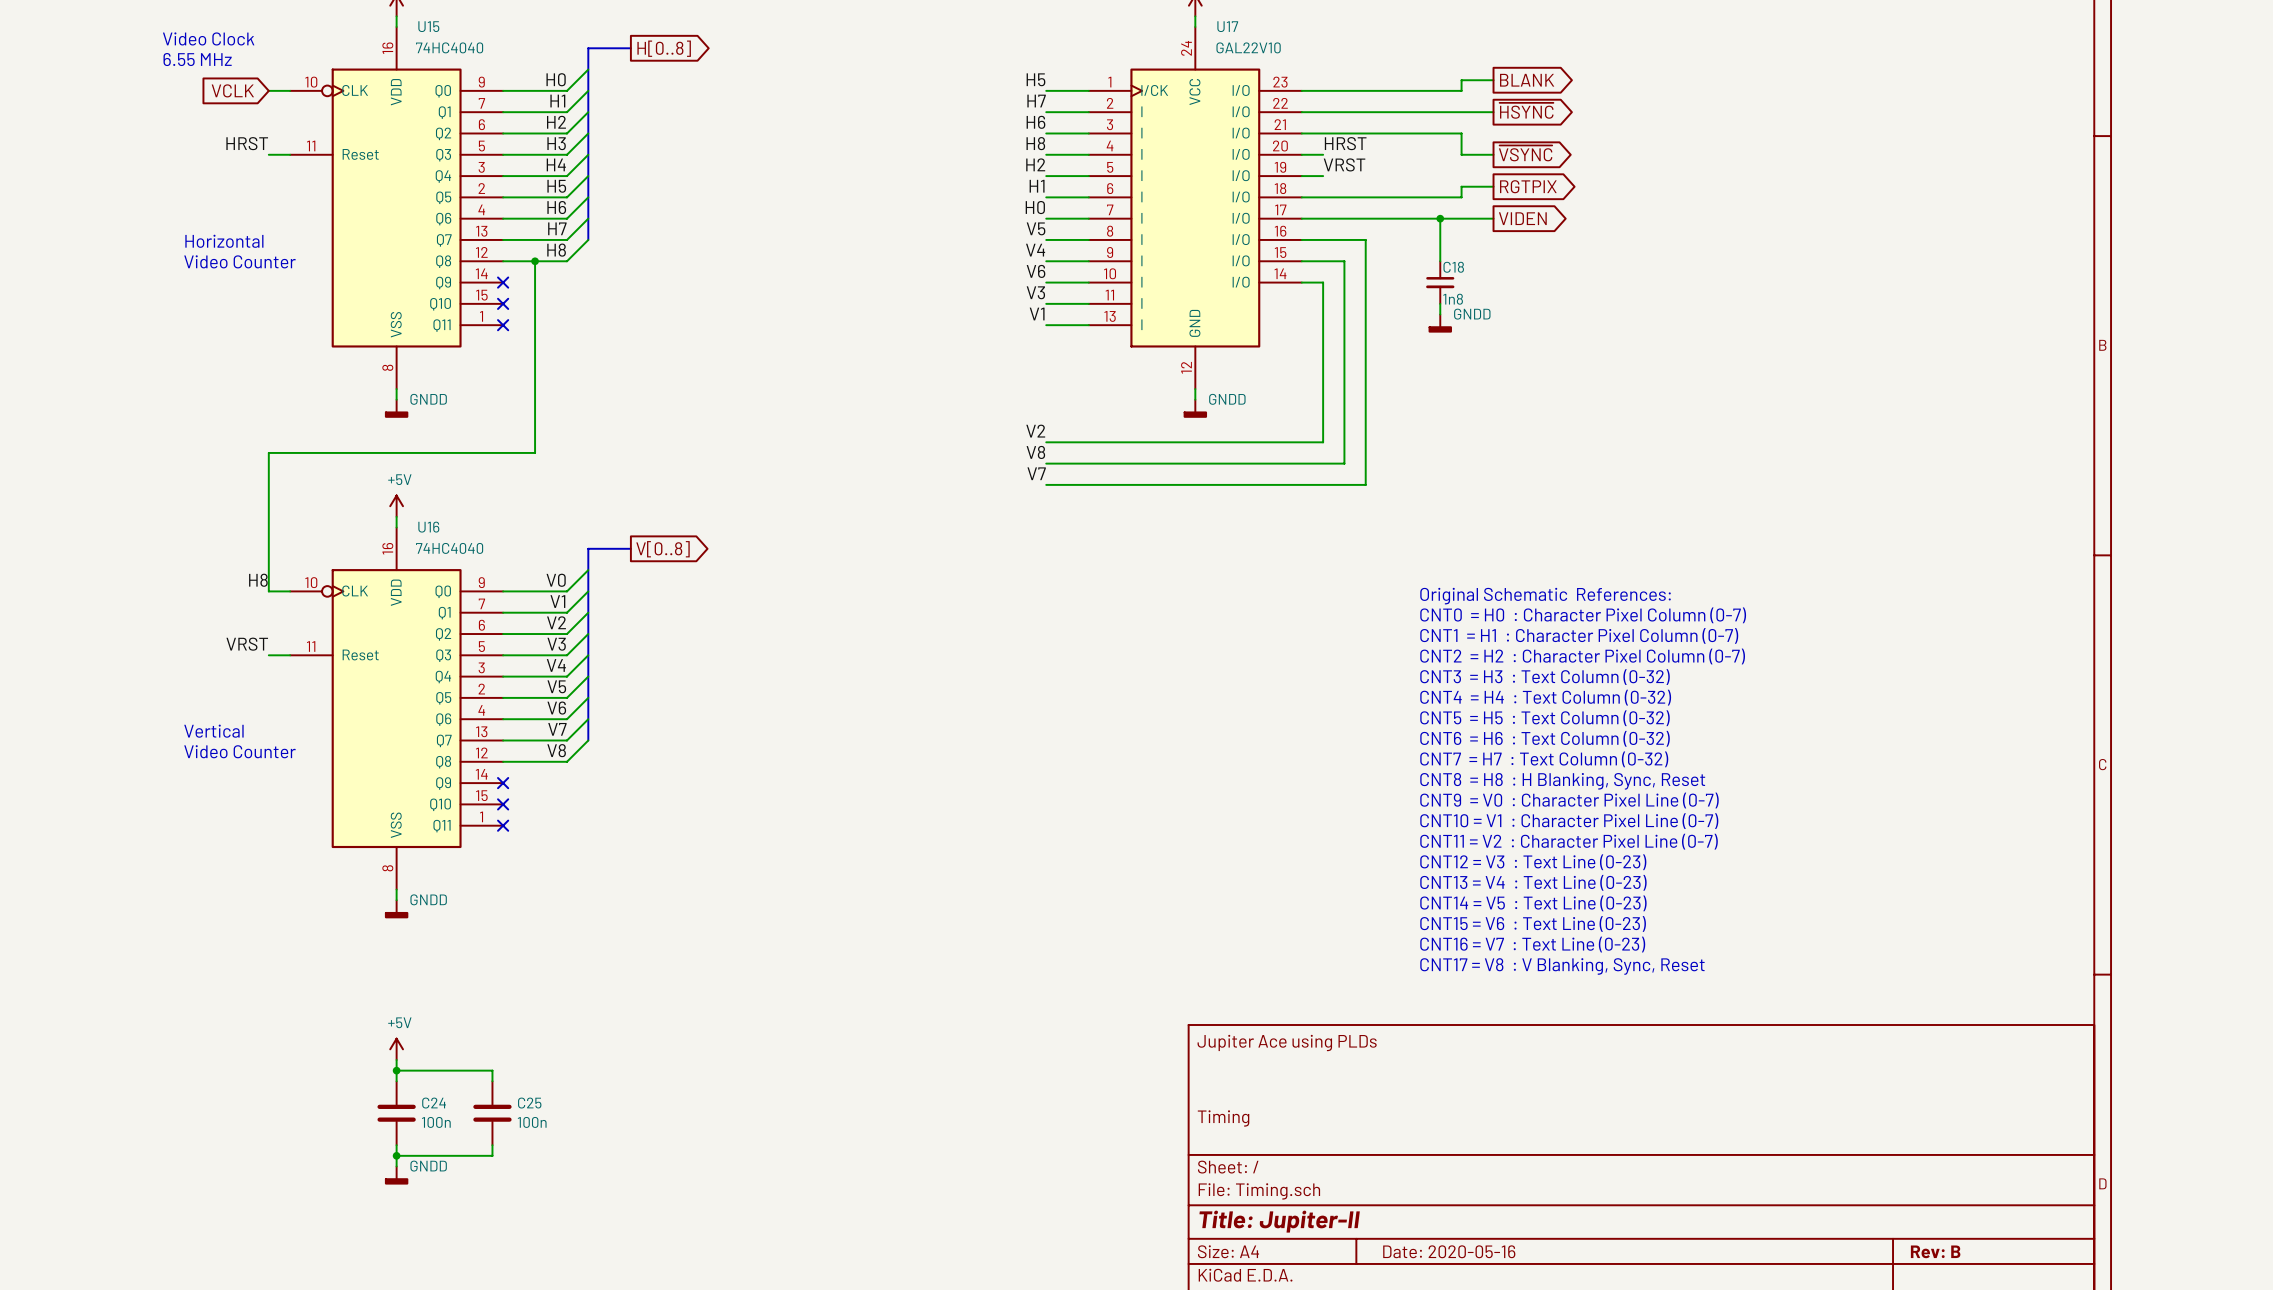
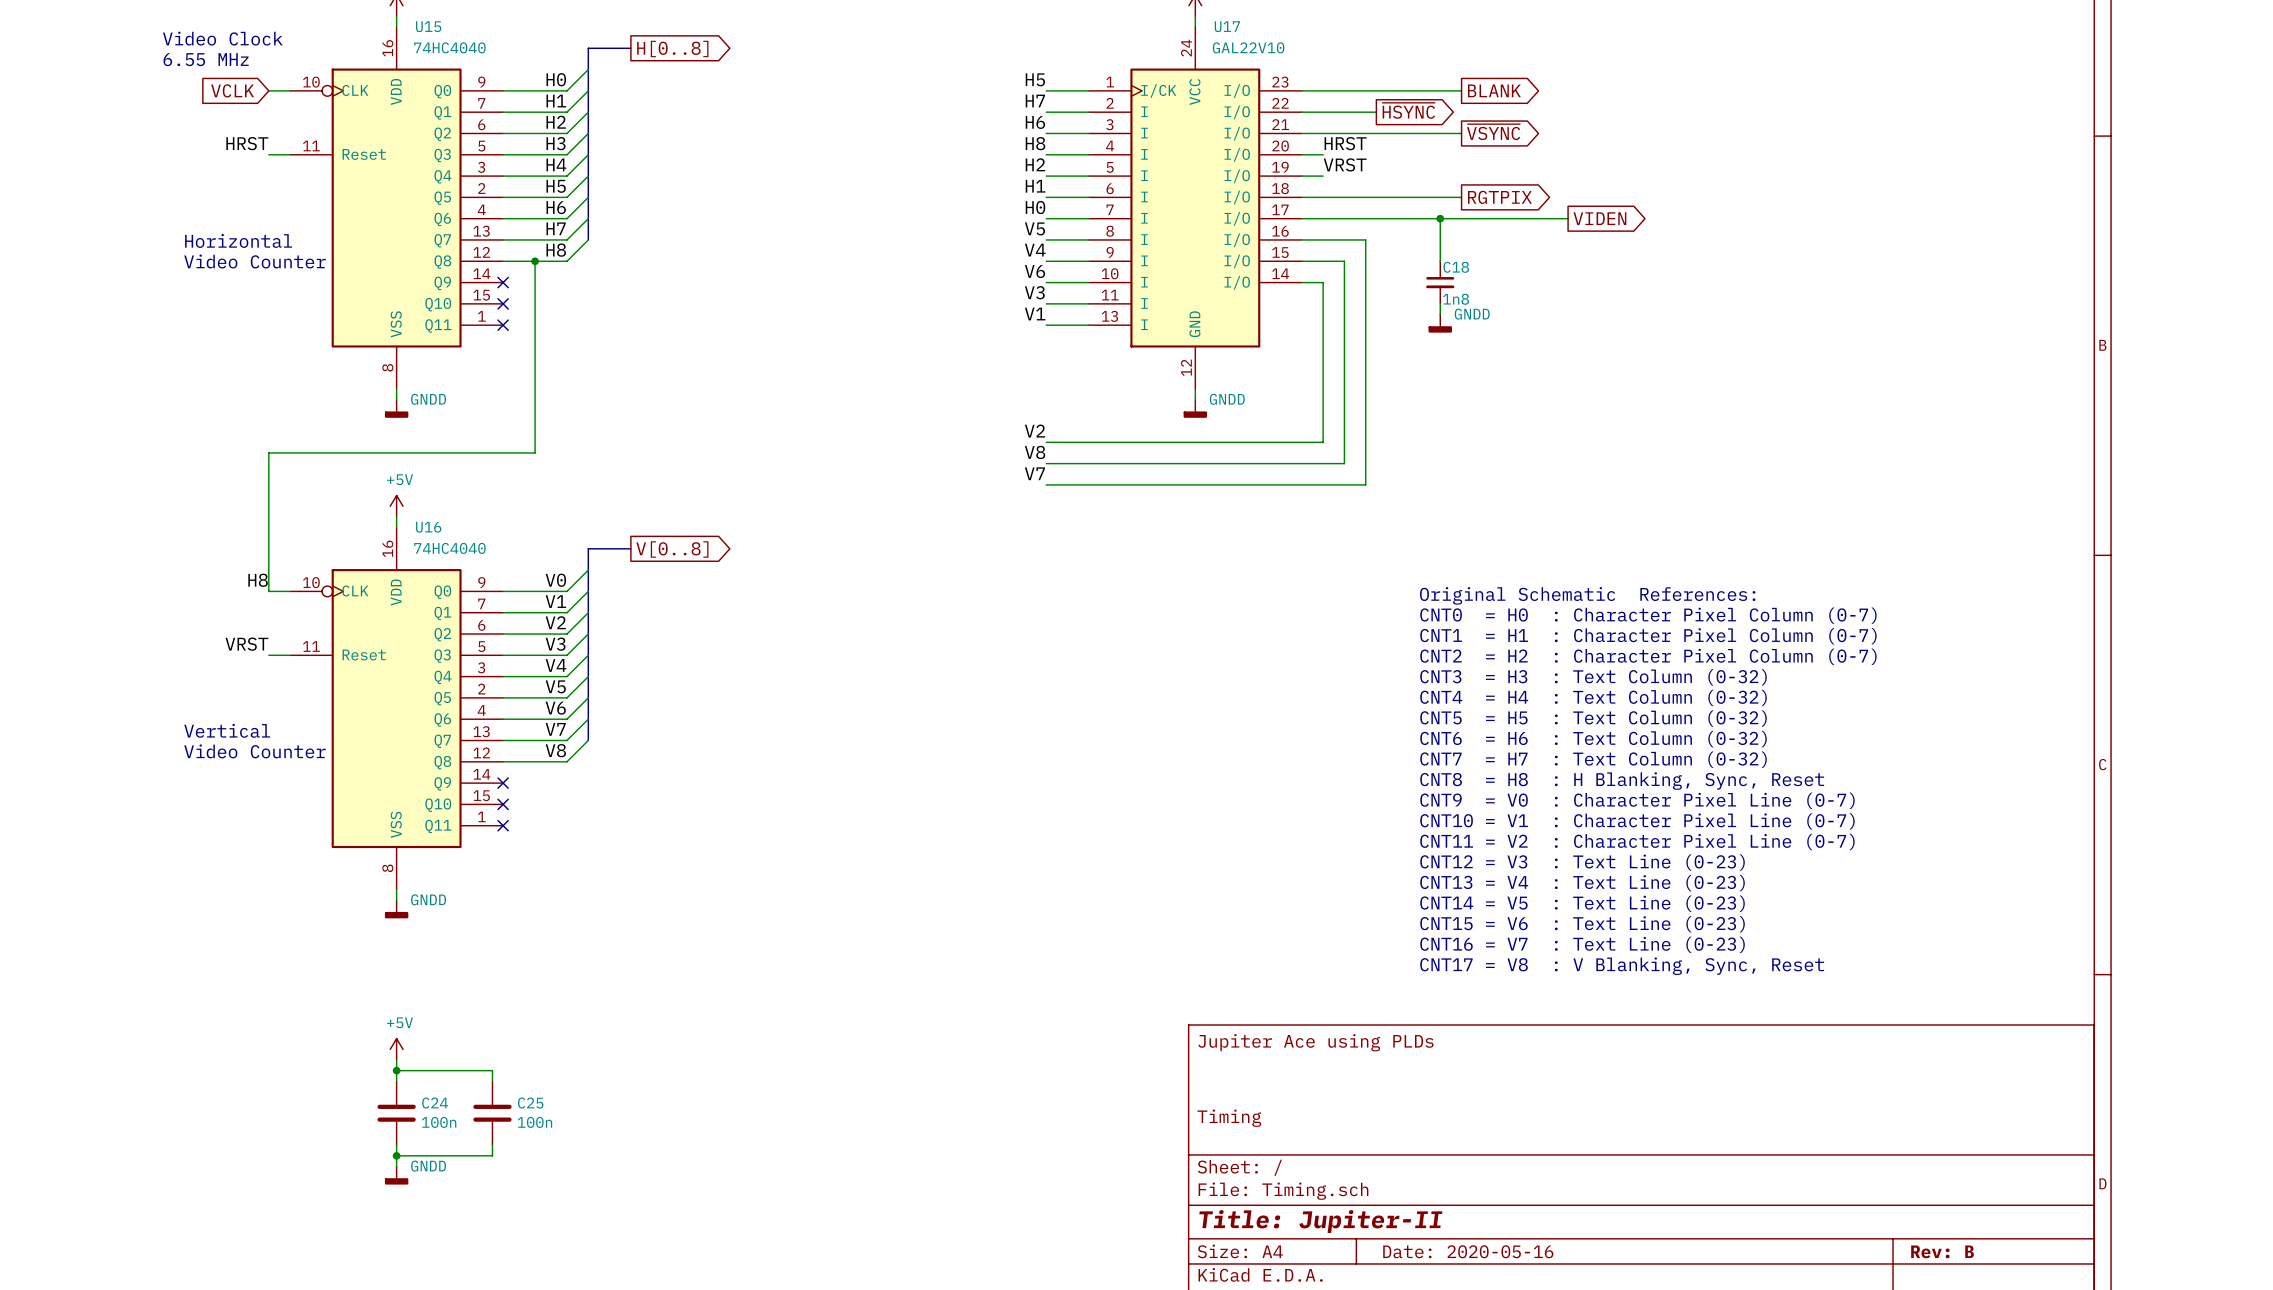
global label position: BLANK (1527, 80) -> BLANK (1494, 90)
global label position: ~{HSYNC} (1526, 110) -> ~{HSYNC} (1408, 110)
wire: (1376, 112) (1493, 112) -> none
wire: (1461, 133) (1461, 154) (1493, 154) -> none
global label position: ~{VSYNC} (1525, 153) -> ~{VSYNC} (1493, 132)
global label position: RGTPIX (1528, 186) -> RGTPIX (1499, 197)
wire: none -> (1493, 218) (1568, 218)
global label position: VIDEN (1522, 218) -> VIDEN (1599, 218)

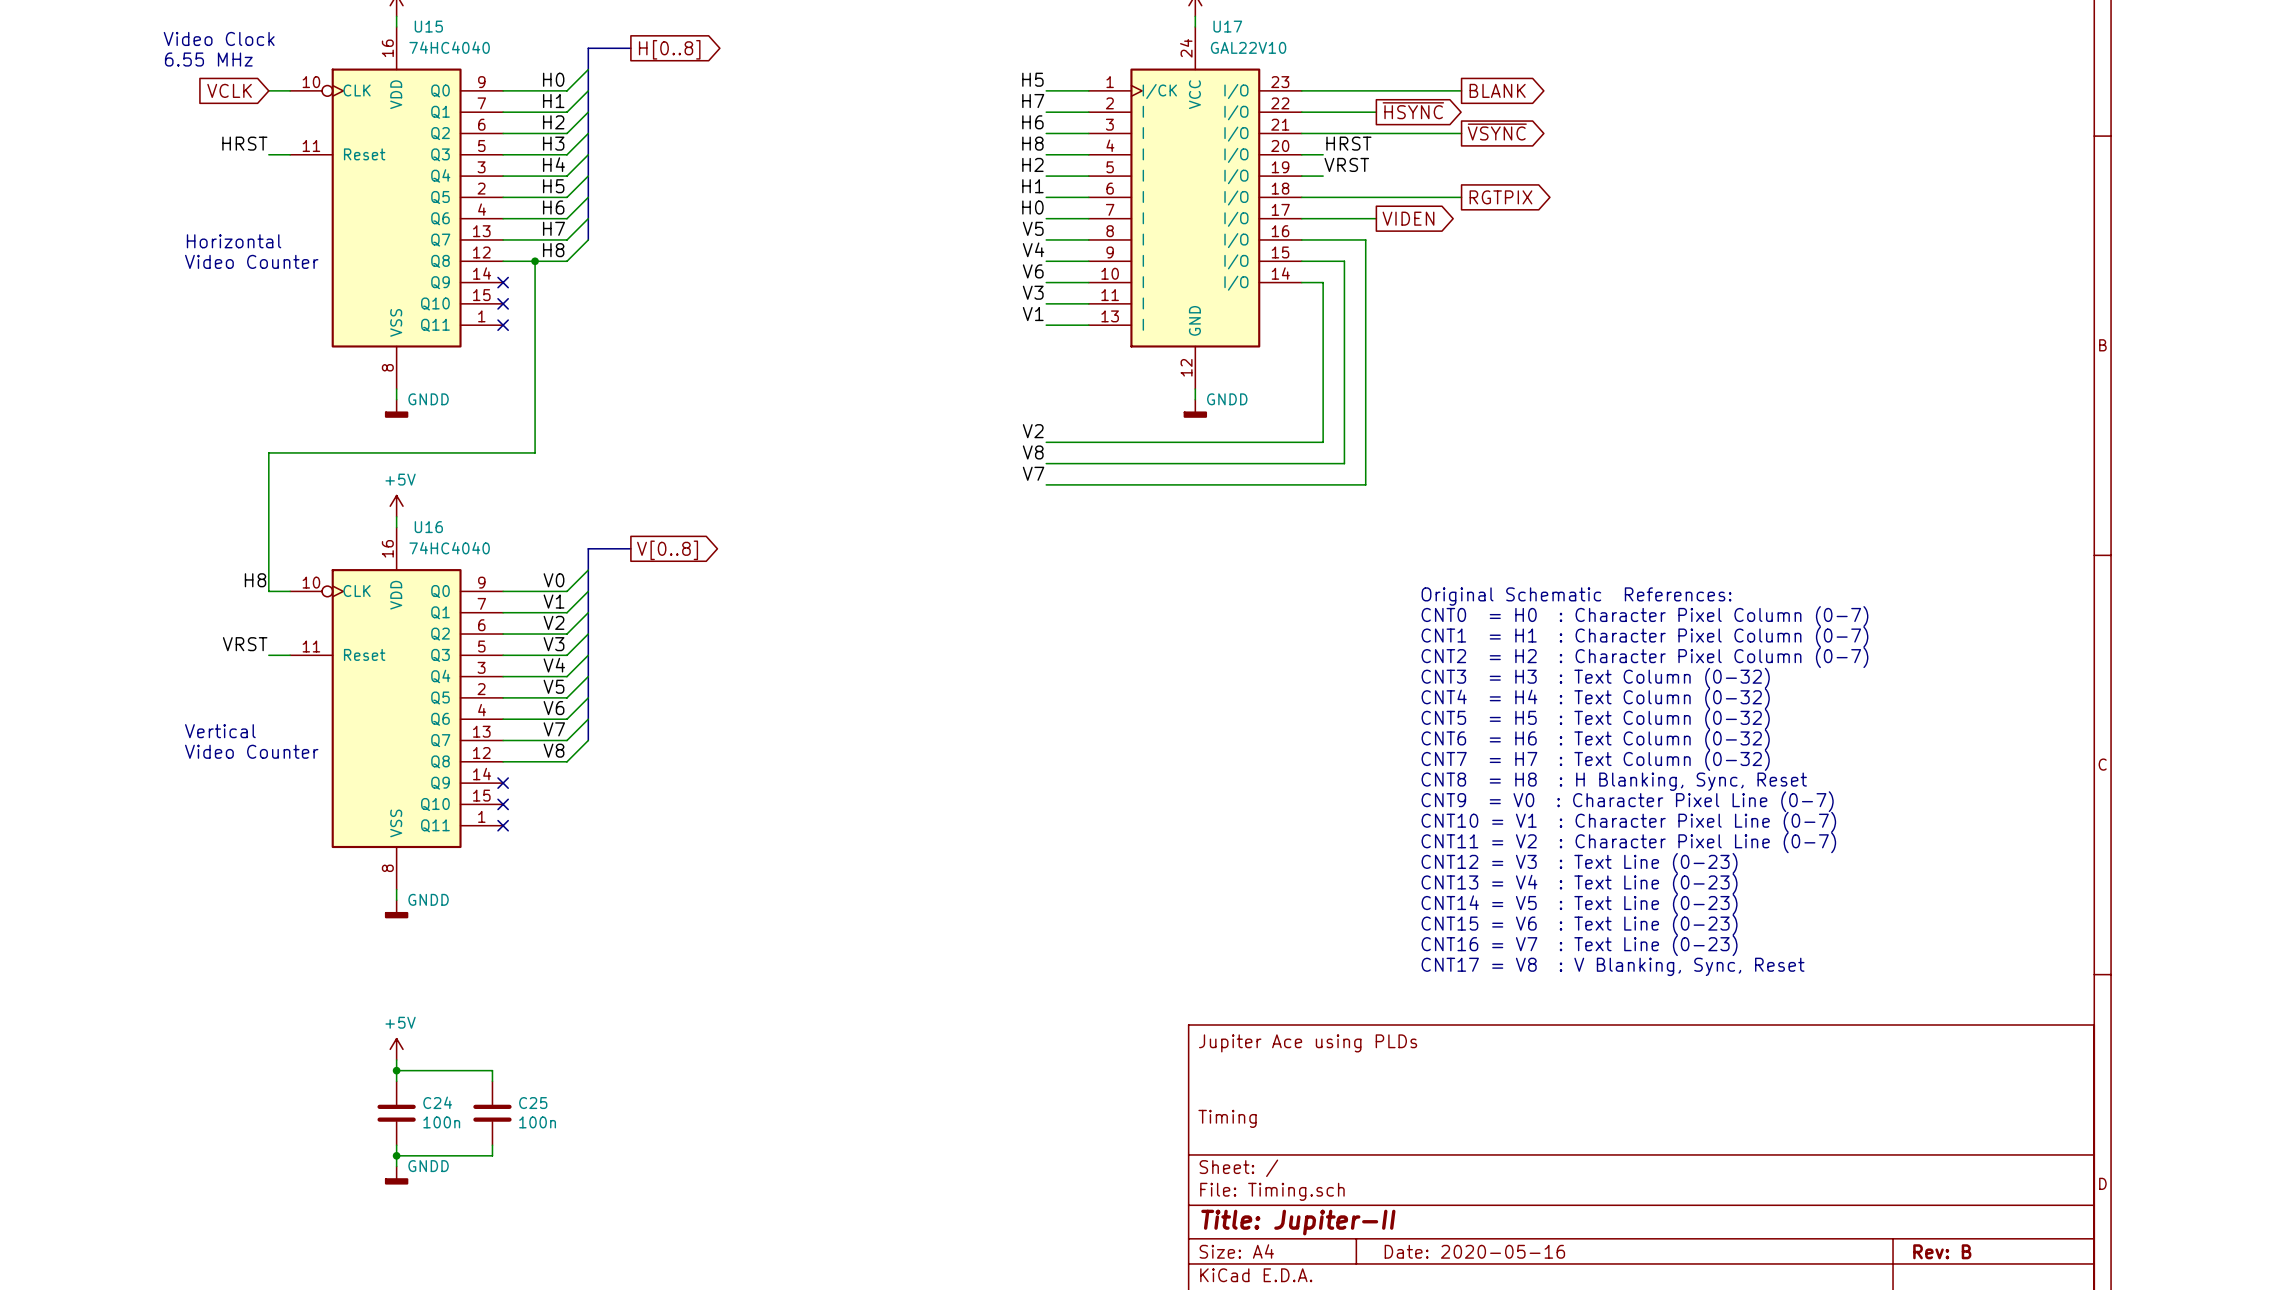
wire: (1376, 218) (1568, 218) -> none
wire: (1440, 218) (1440, 261) -> none
junction: (1440, 218) -> none
global label position: VIDEN (1599, 218) -> VIDEN (1408, 218)
C18: 1n8 (1440, 282) -> none
wire: (1440, 303) (1440, 314) -> none
power symbol: GNDD (1440, 323) -> none

